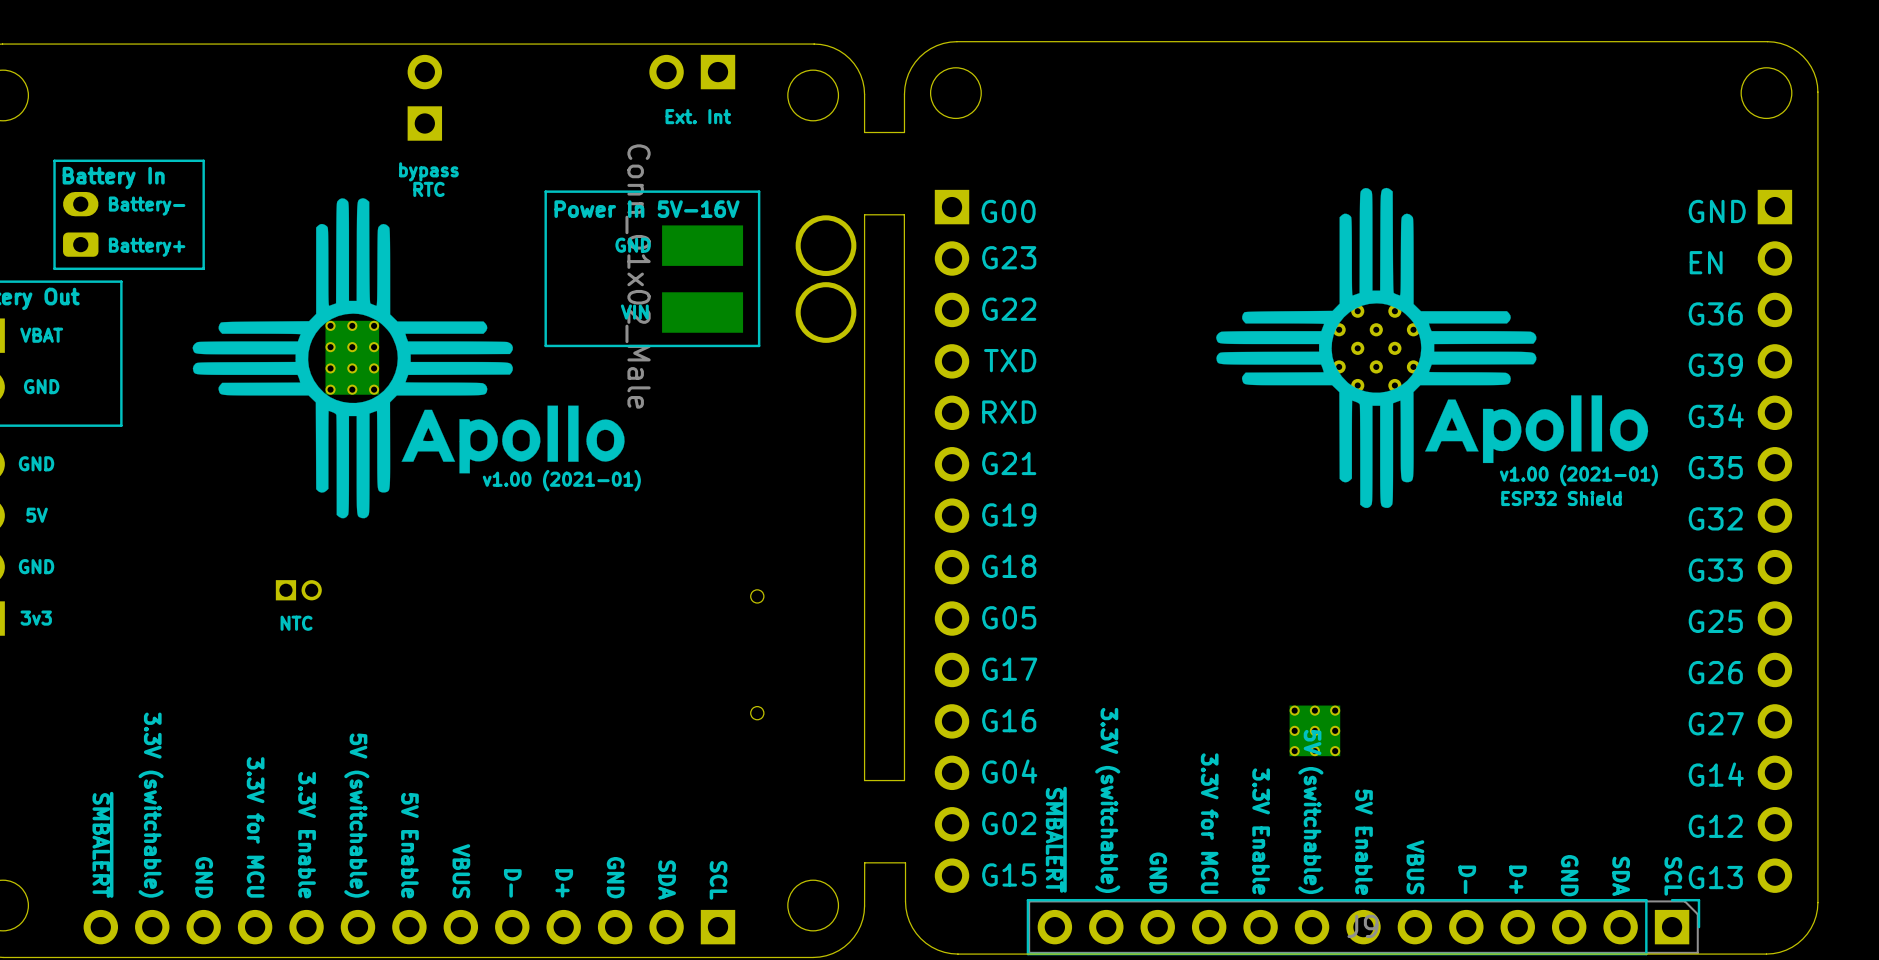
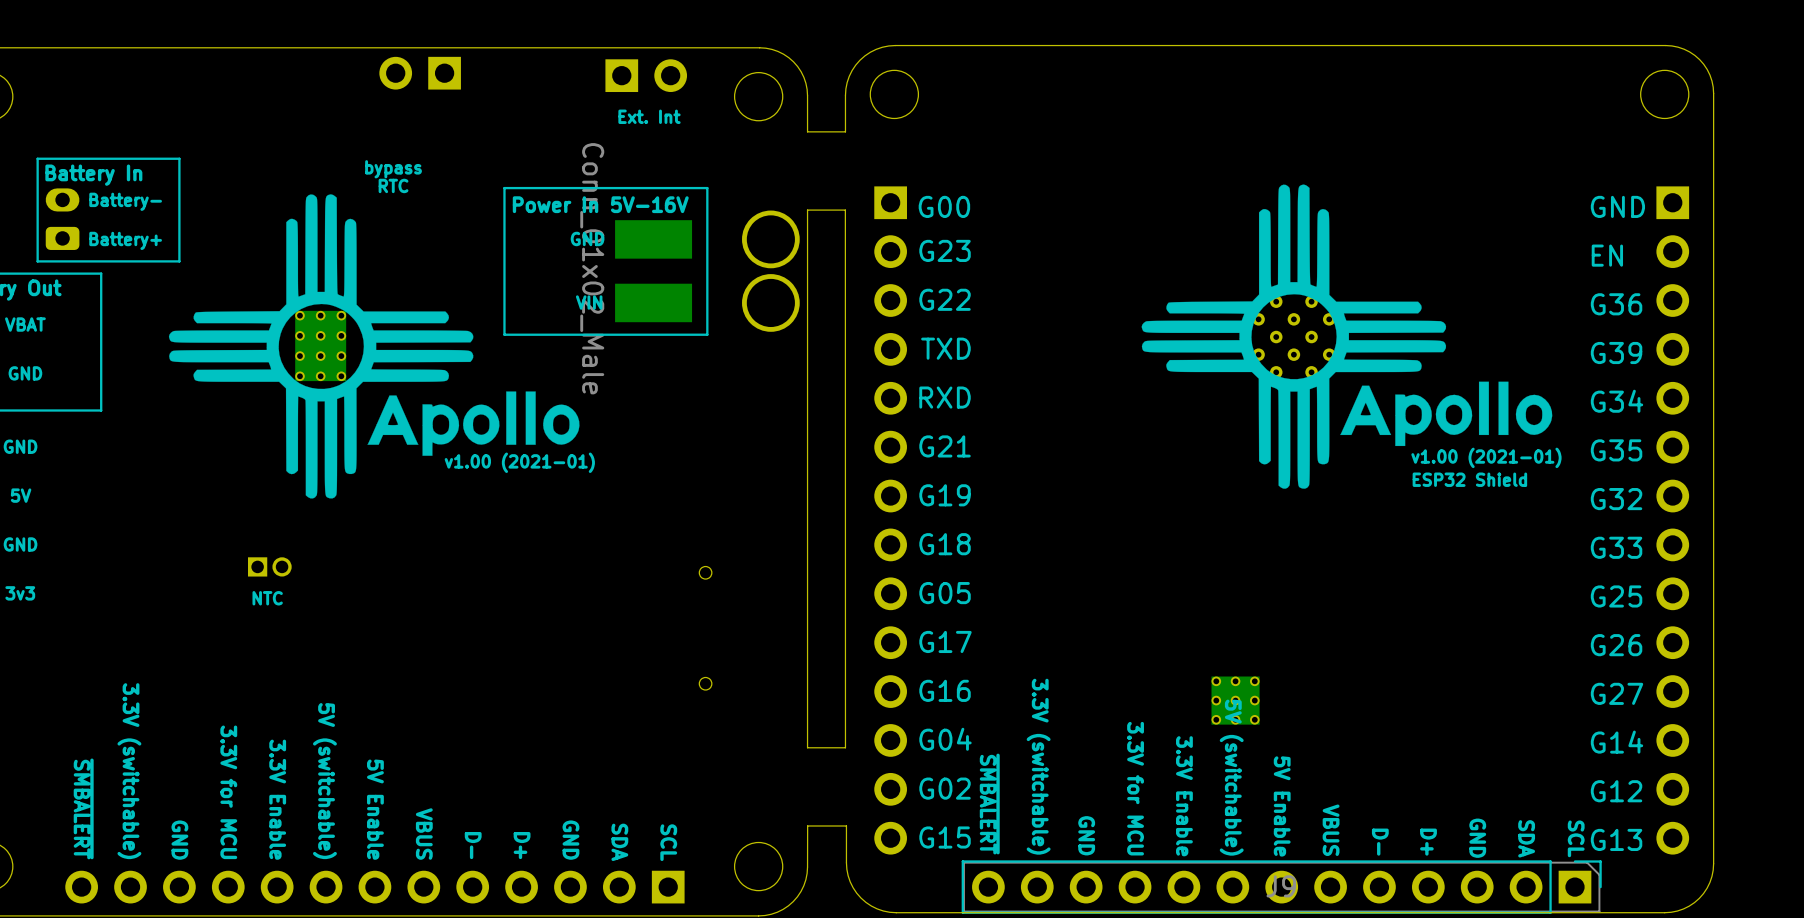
part rotation: 0° (692, 72) -> 180° (646, 75)
part rotation: 0° (424, 97) -> 90° counterclockwise (420, 73)

